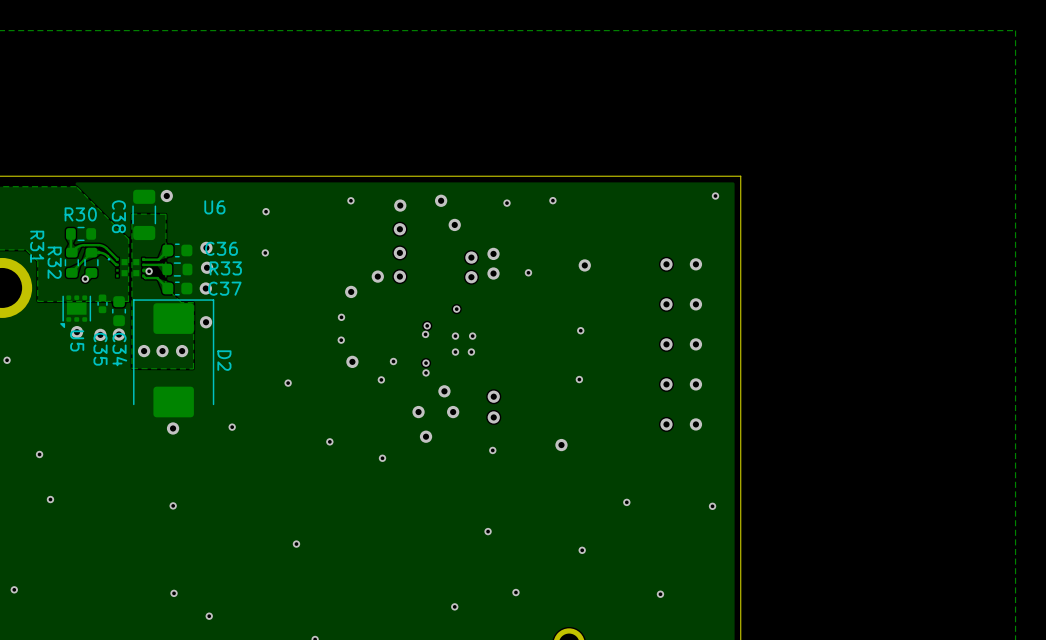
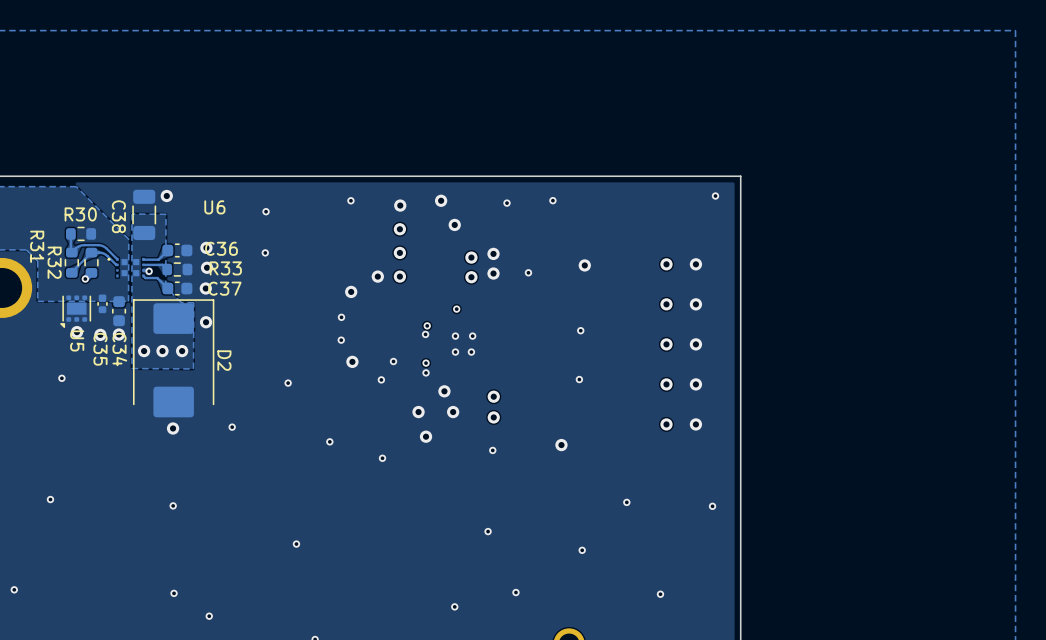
via: (7, 360) -> none
via: none -> (61, 378)
via: (39, 454) -> none

